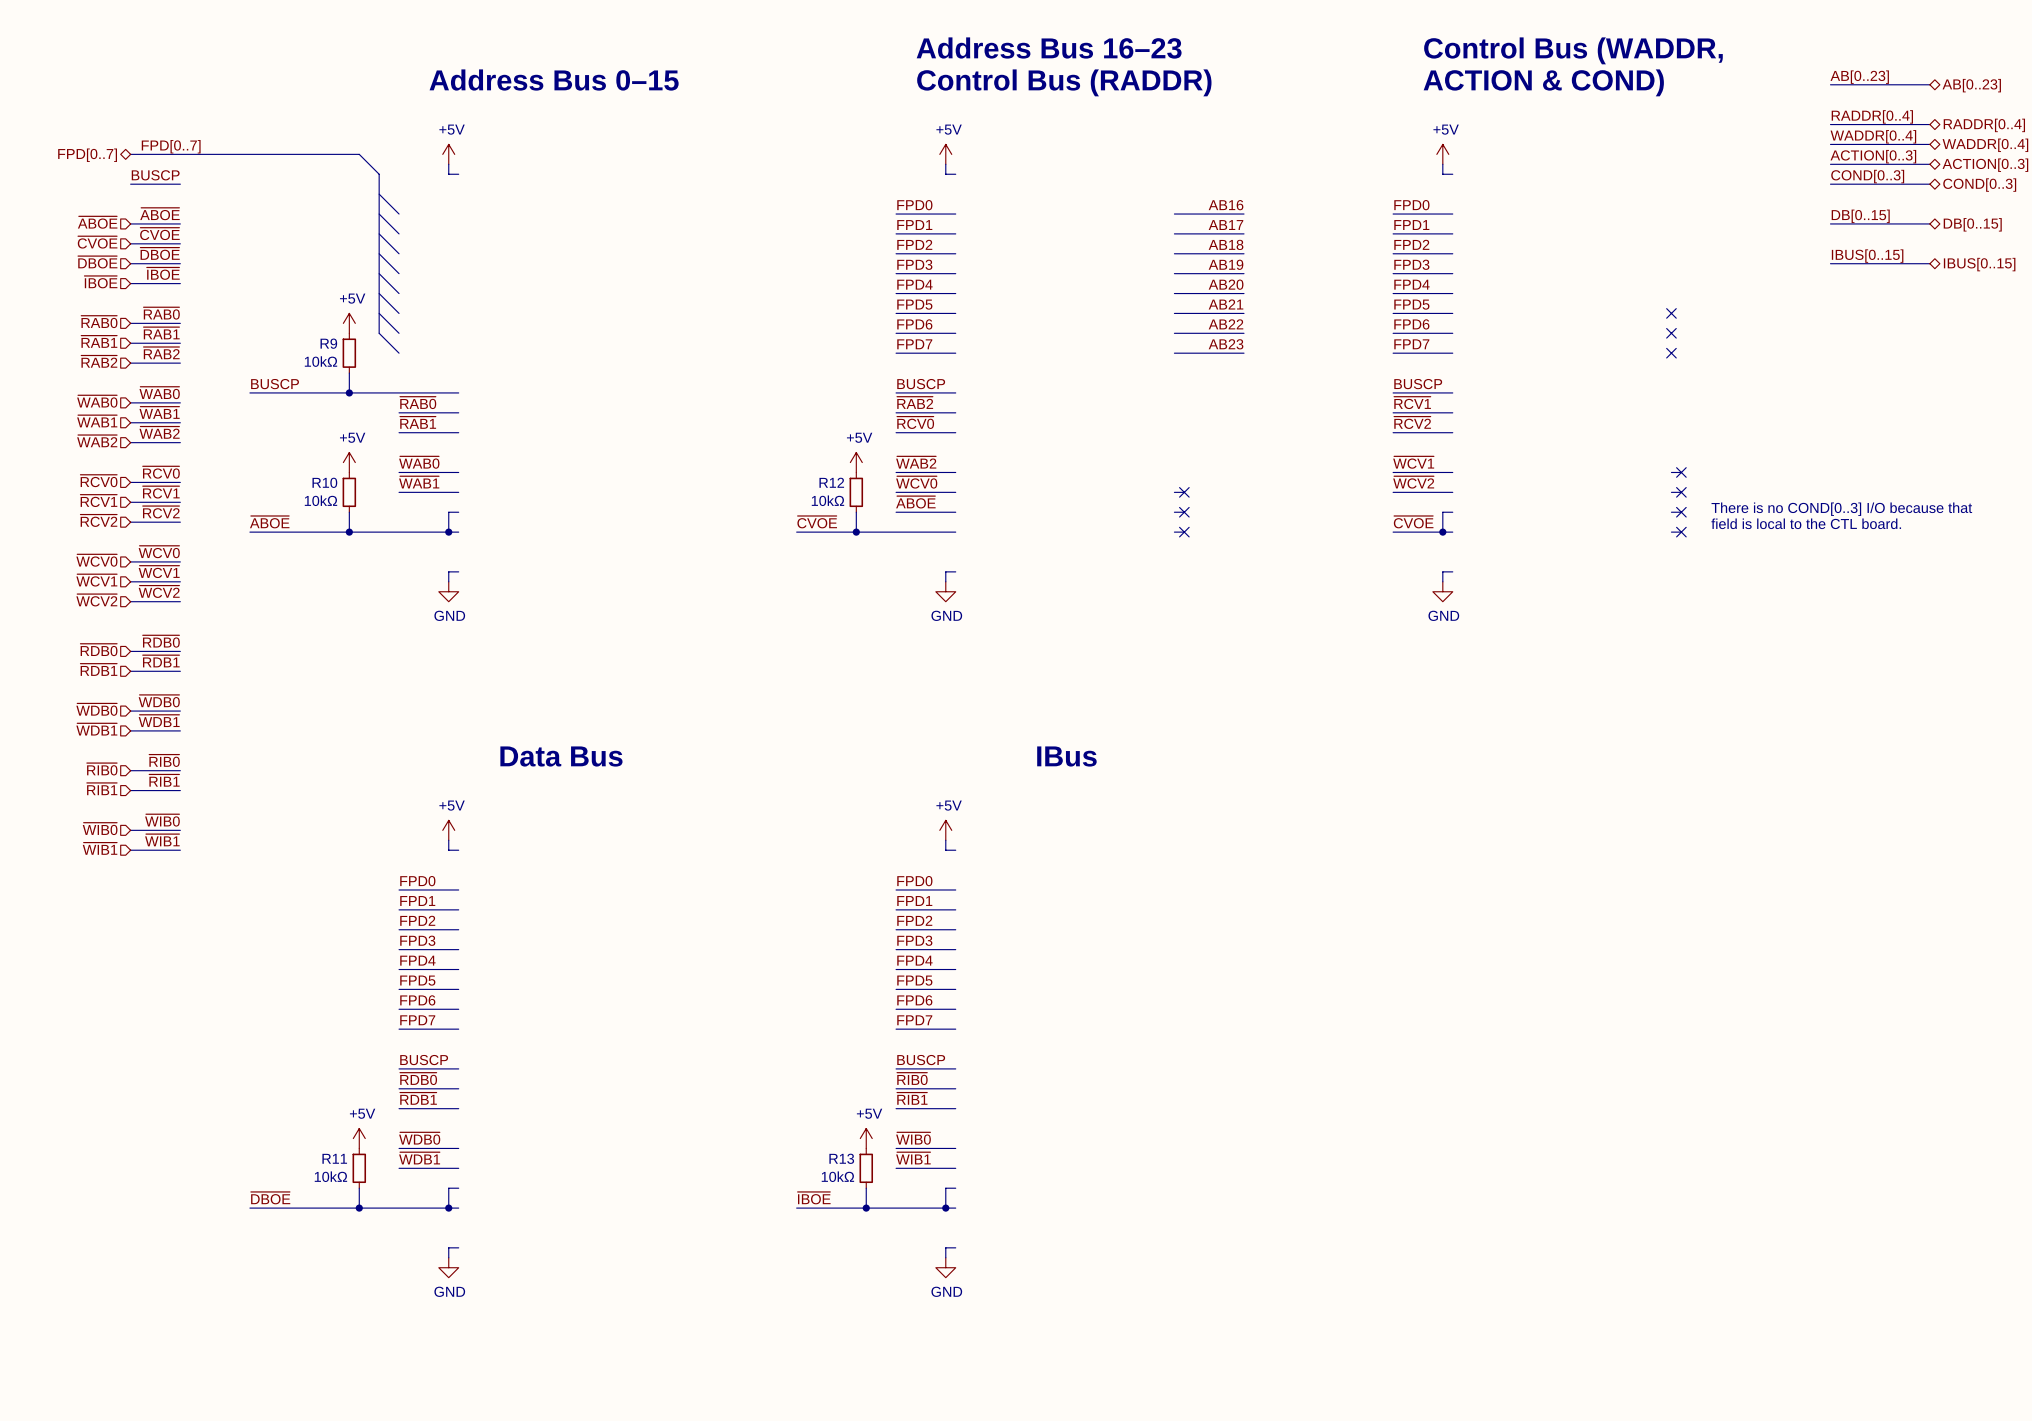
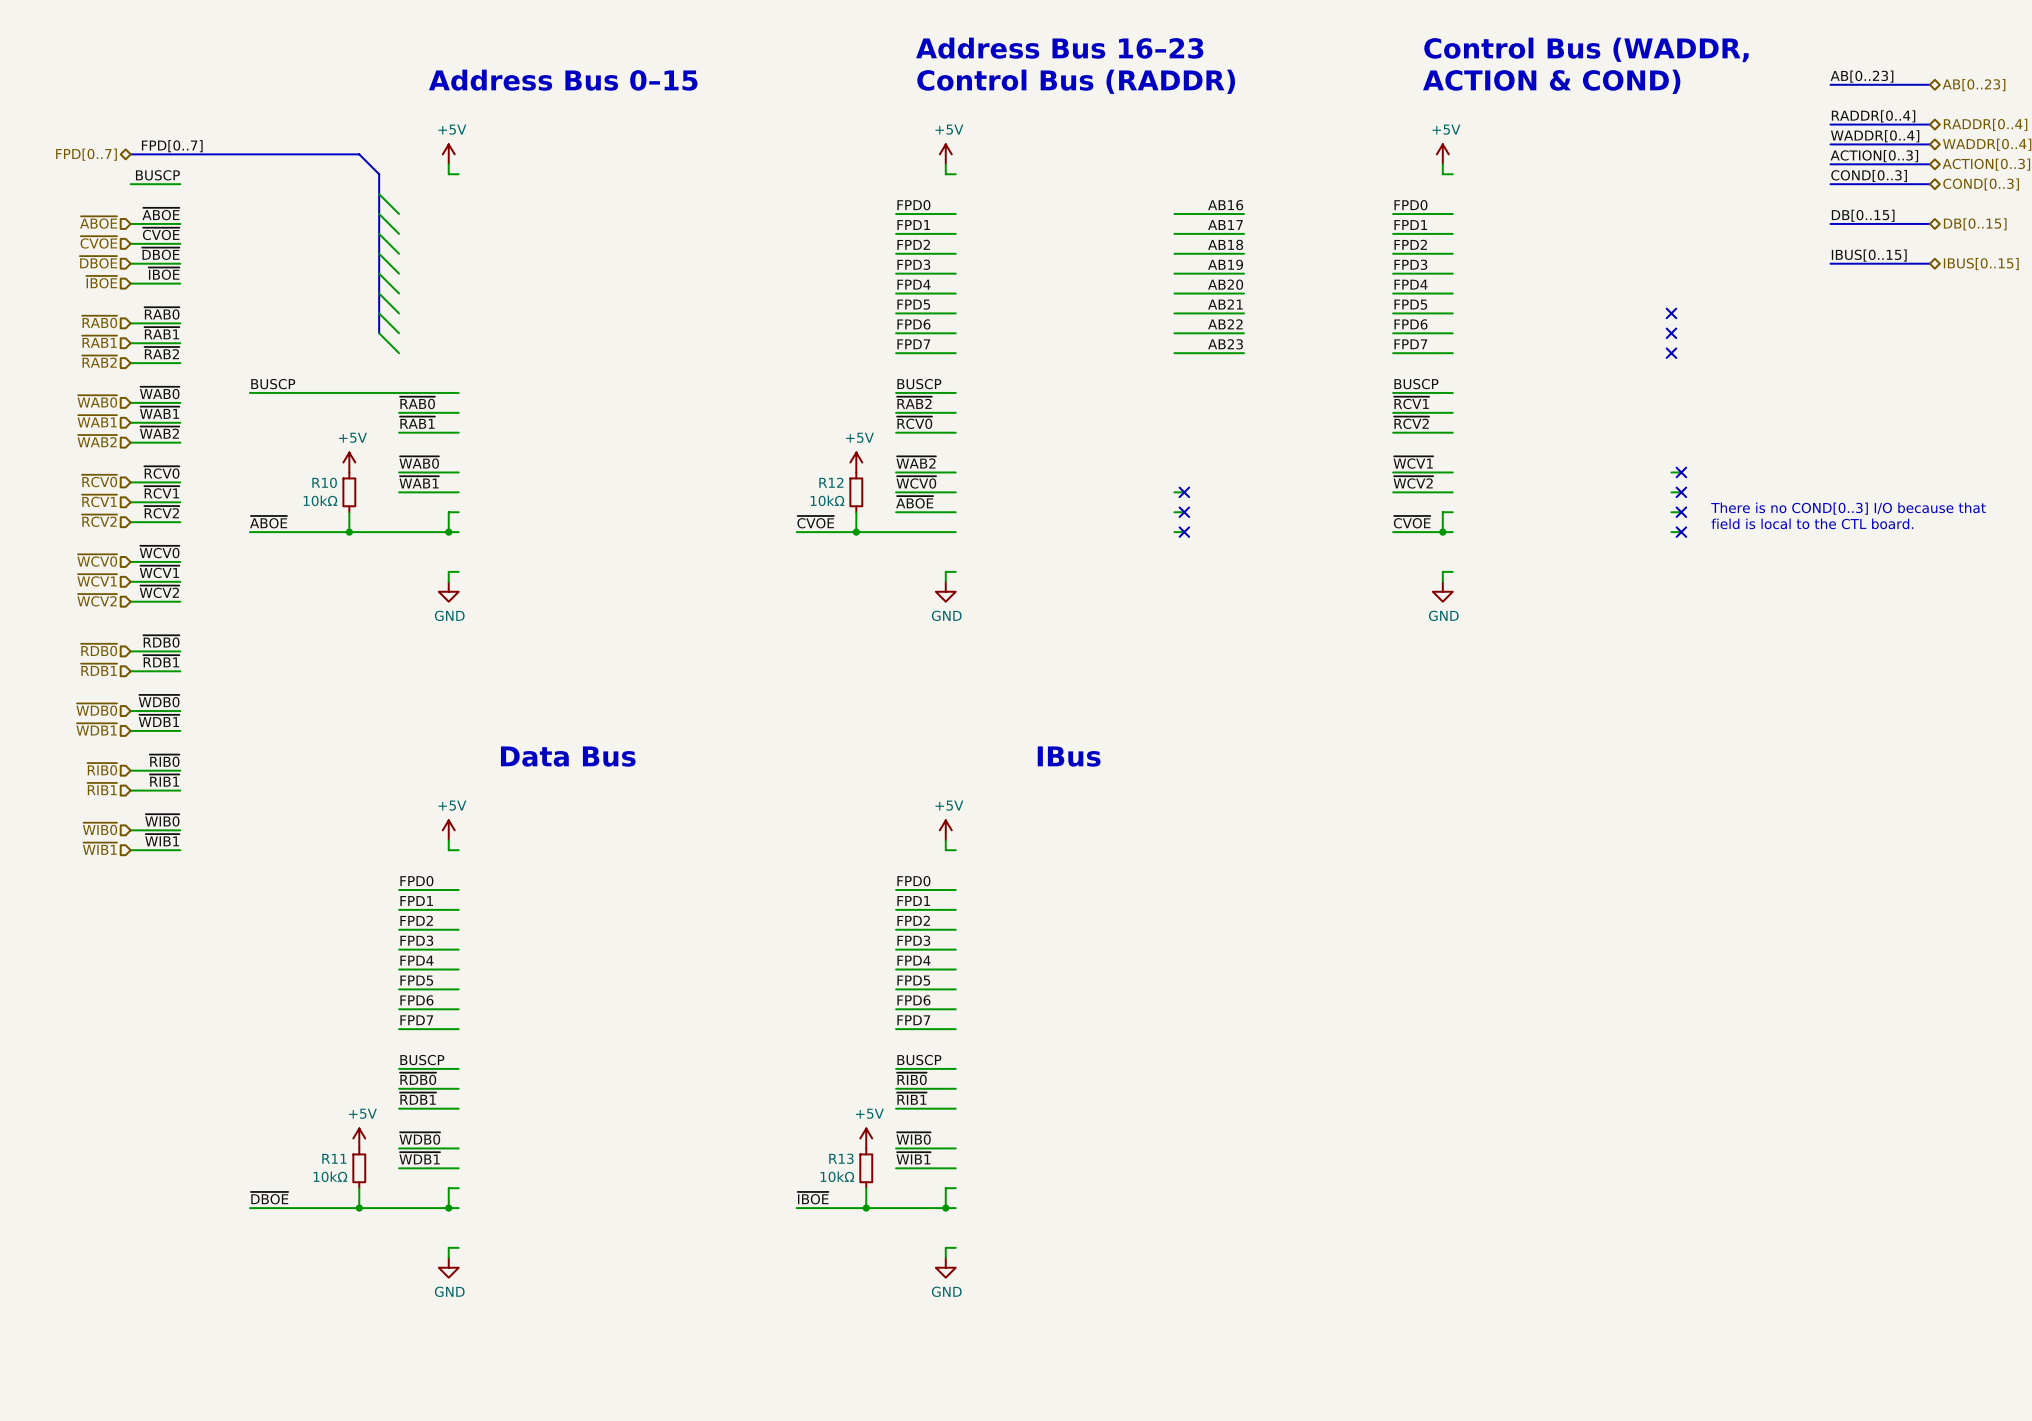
power symbol: +5V (349, 323) -> none
R9: 10kΩ (349, 353) -> none
wire: (349, 373) (349, 392) -> none
junction: (349, 392) -> none

